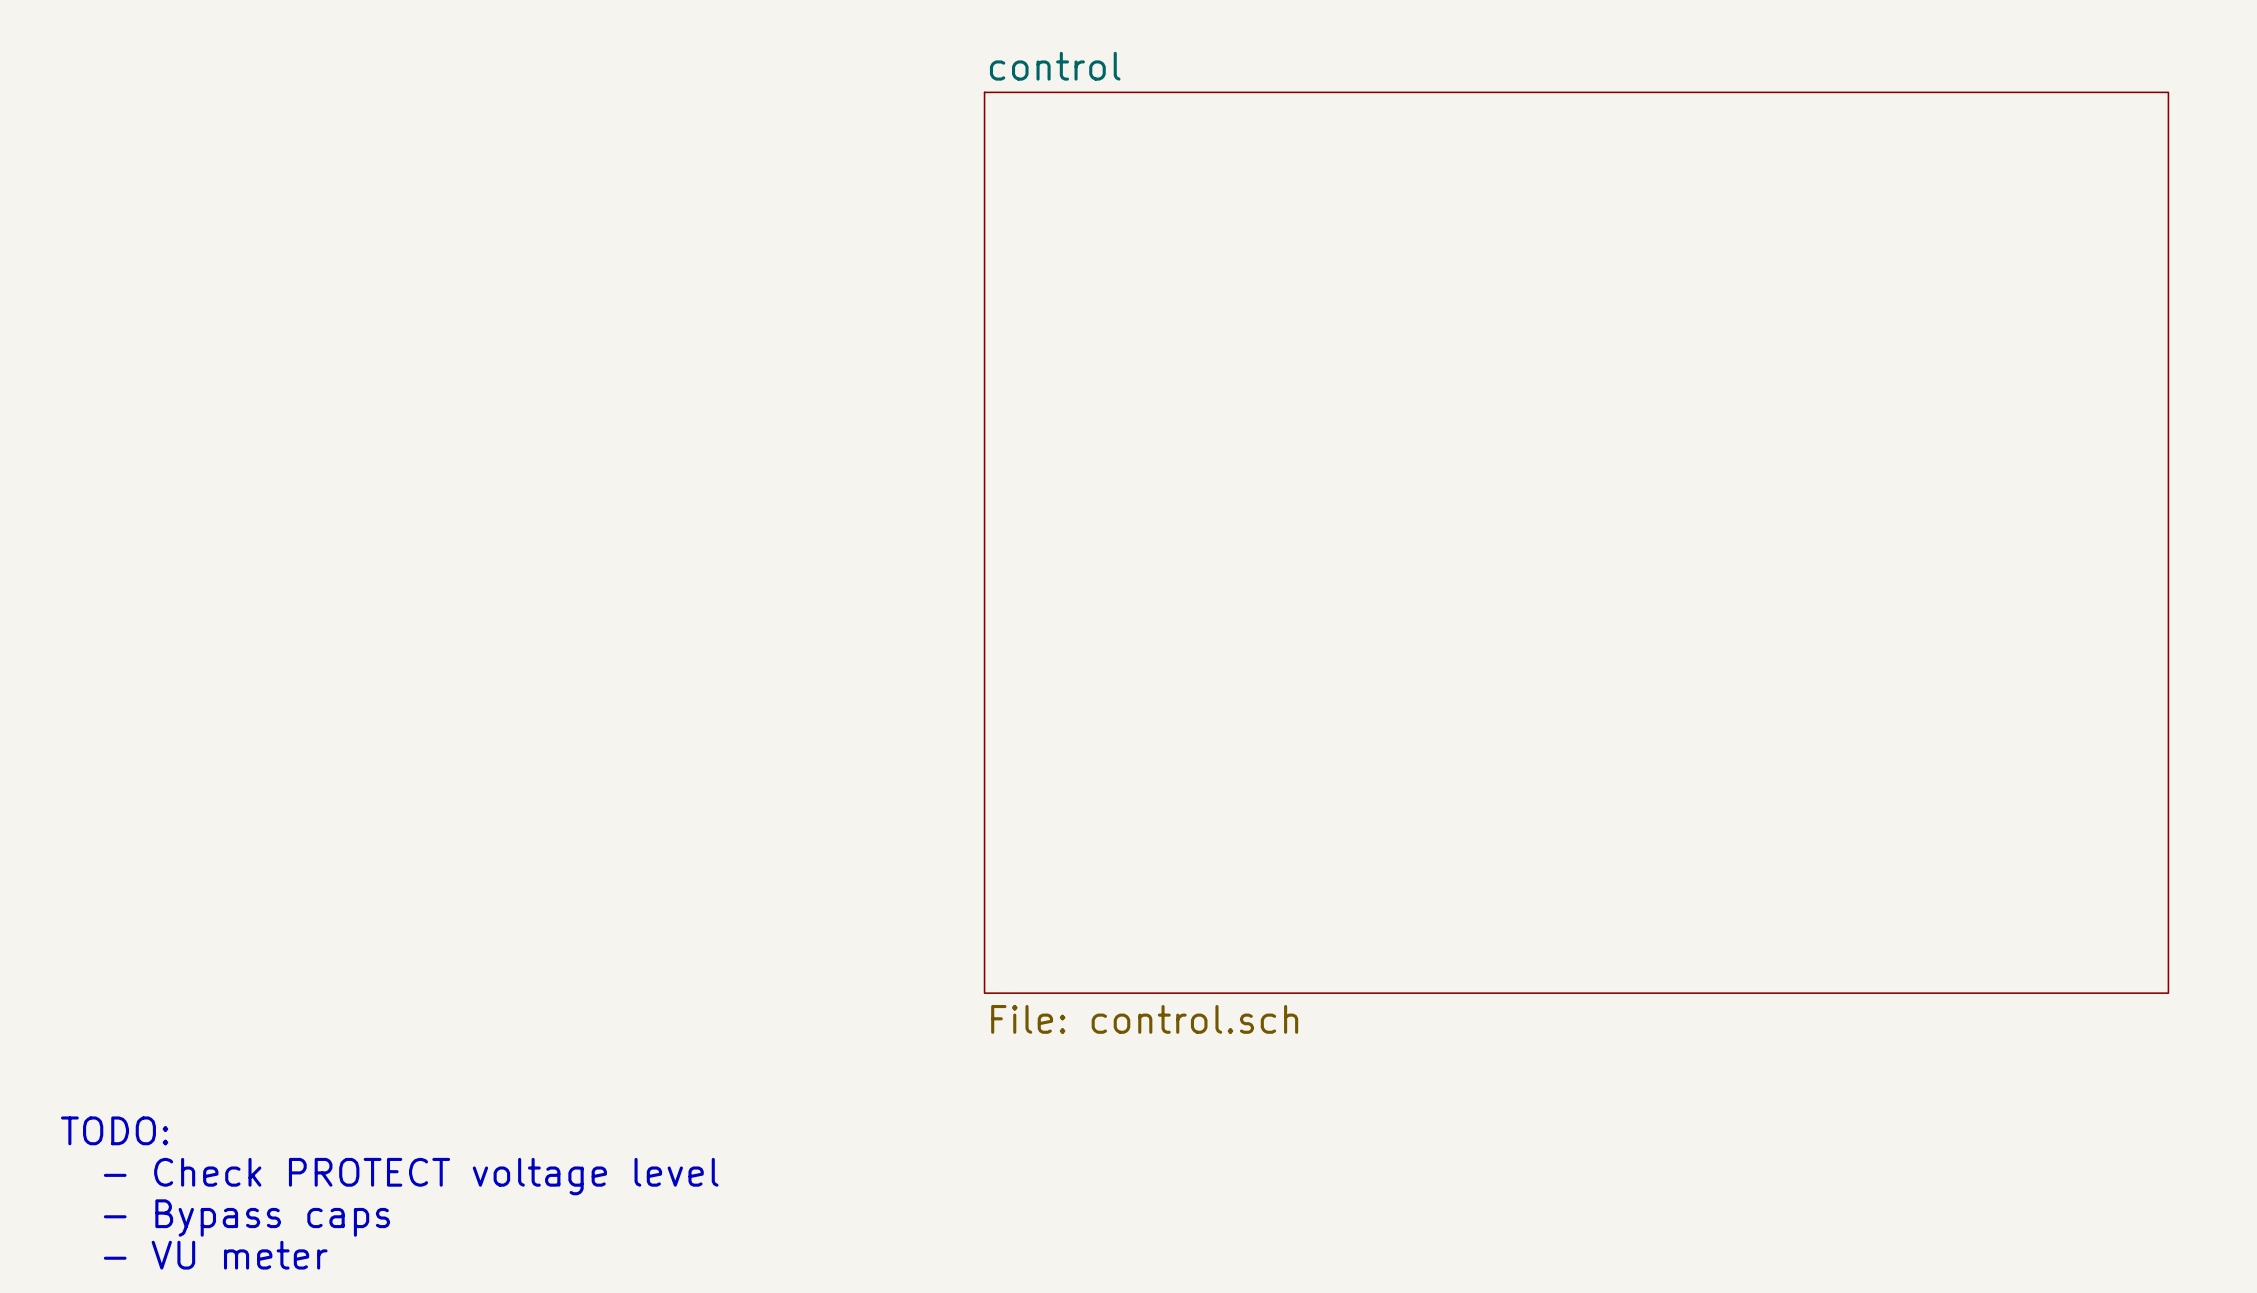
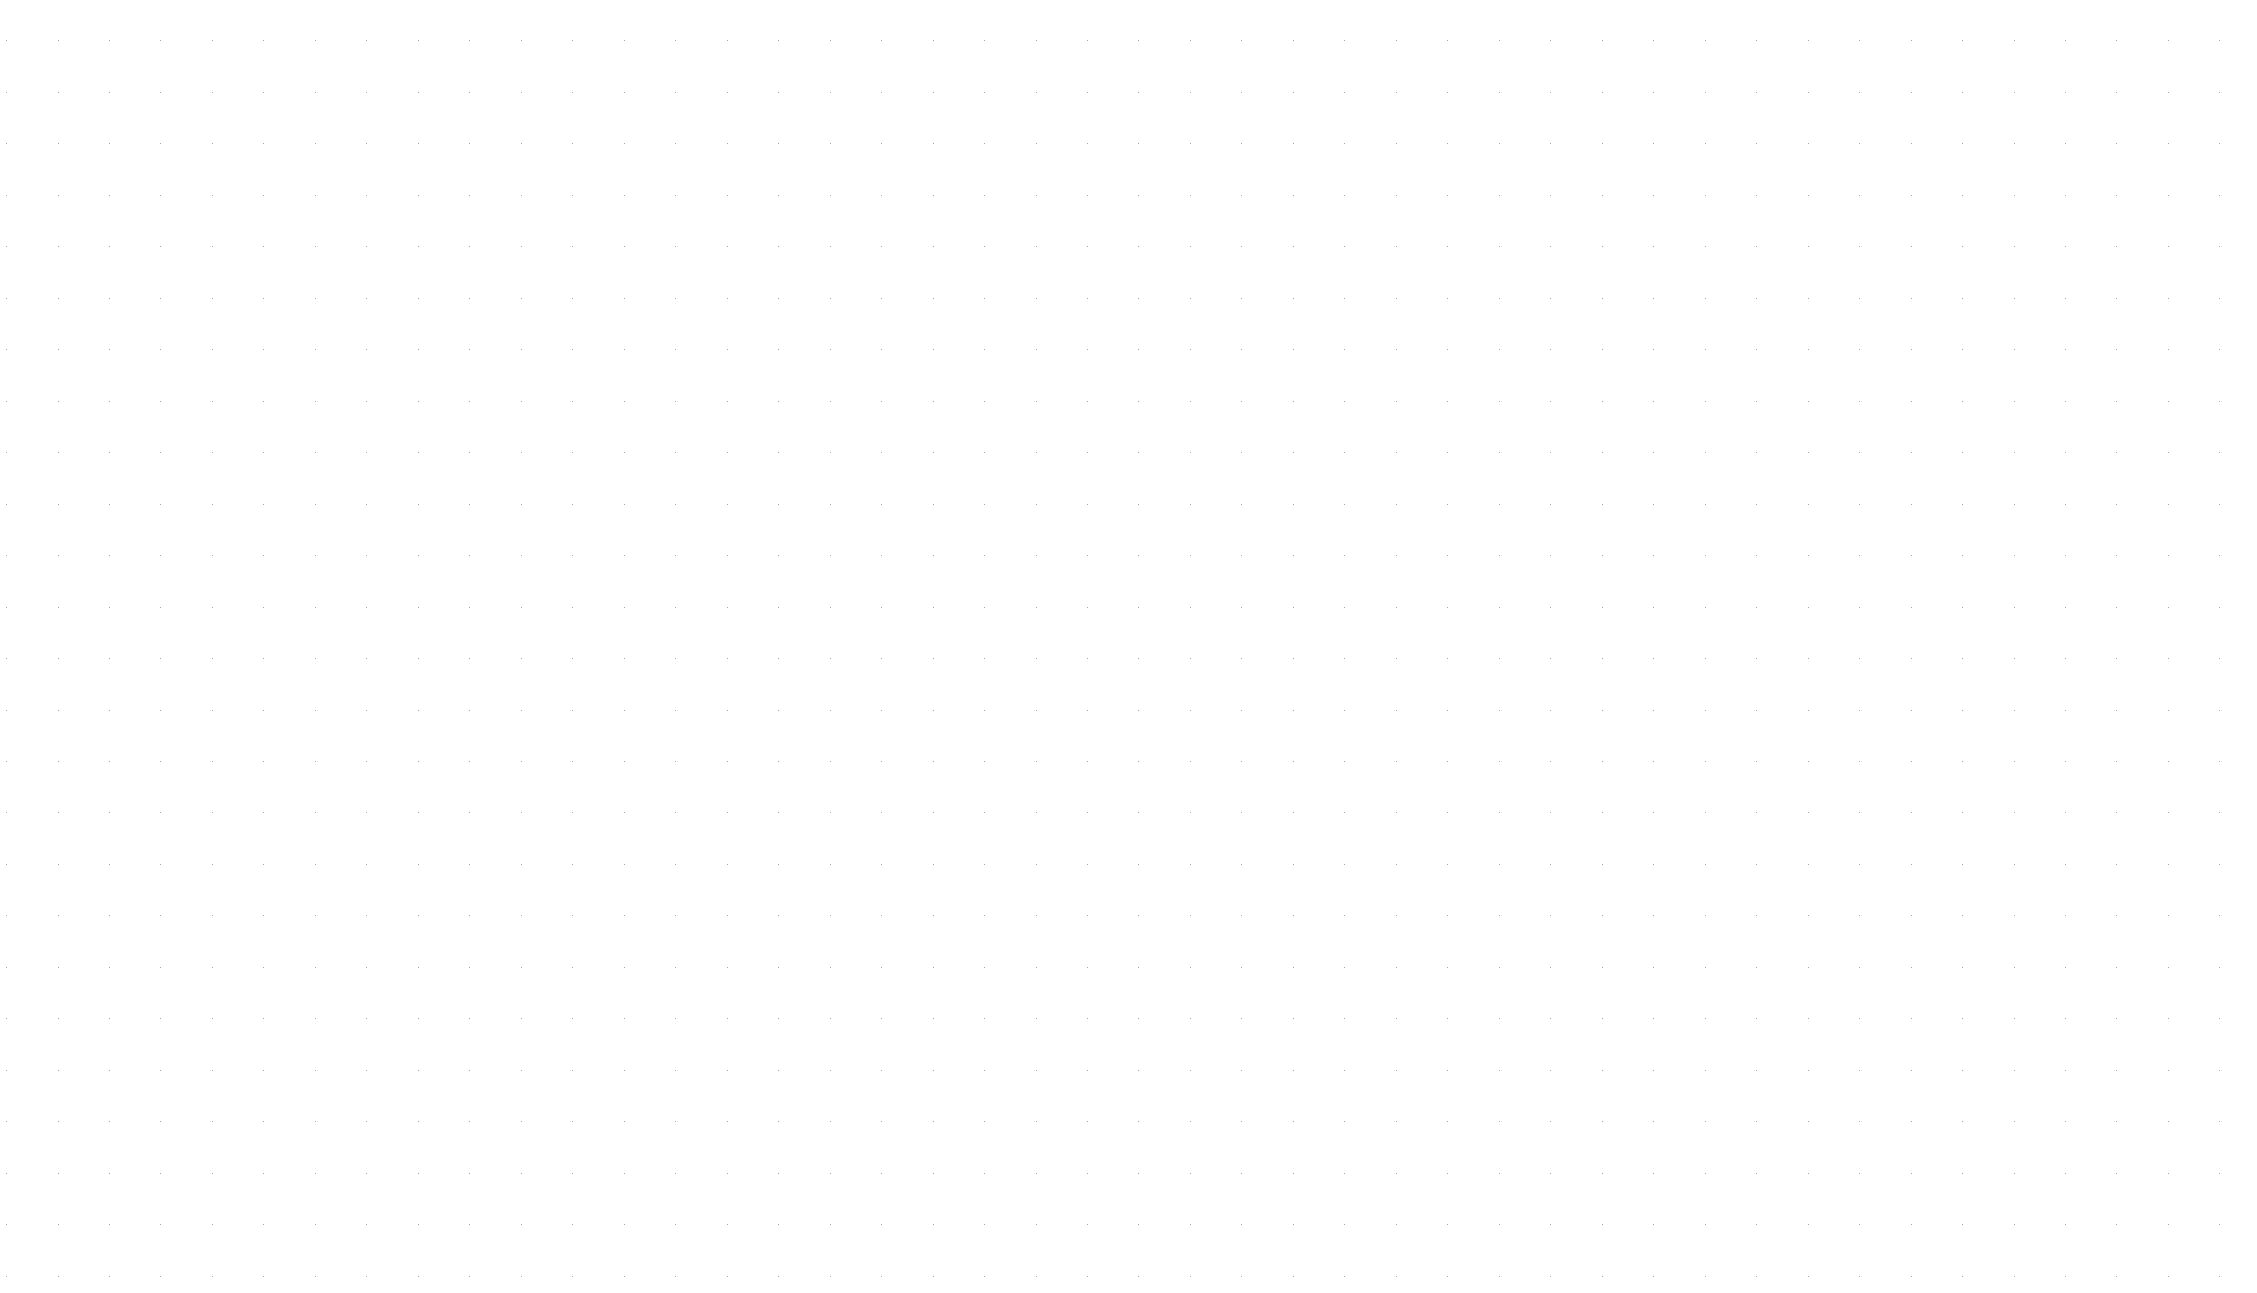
sheet control: File: control.sch (1576, 542) -> none
text: TODO: (114, 1130) -> none
text: - Check PROTECT voltage level (411, 1176) -> none
text: - Bypass caps (246, 1218) -> none
text: - VU meter (215, 1255) -> none

